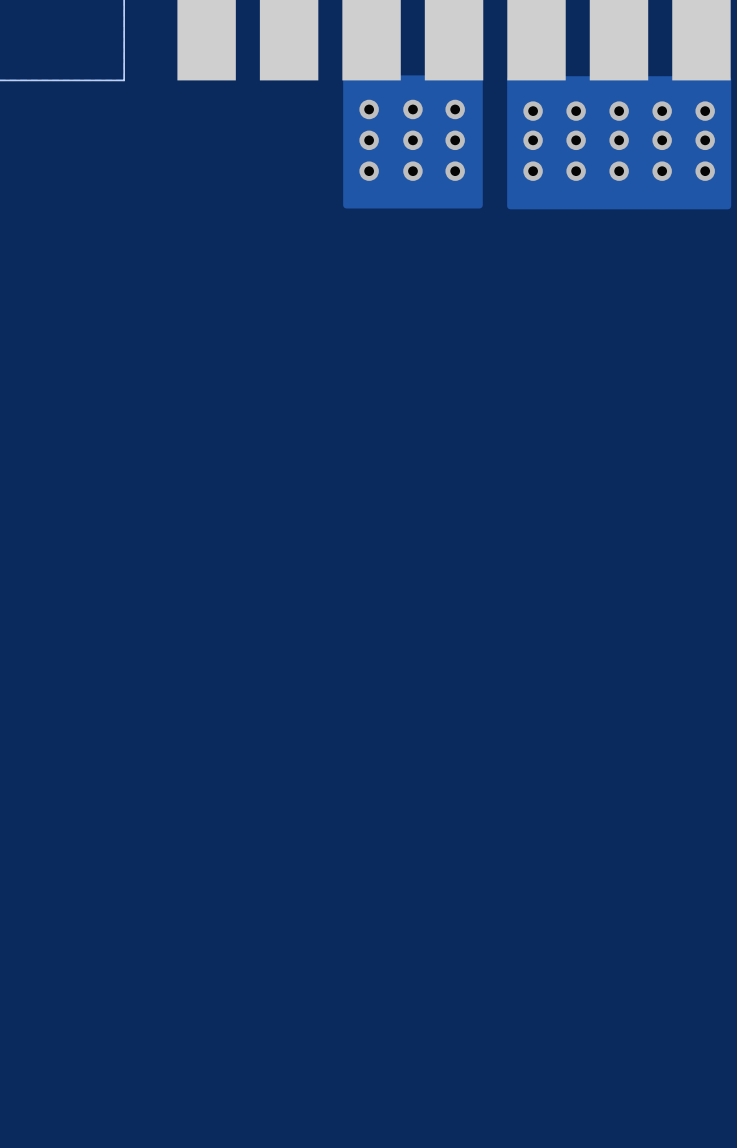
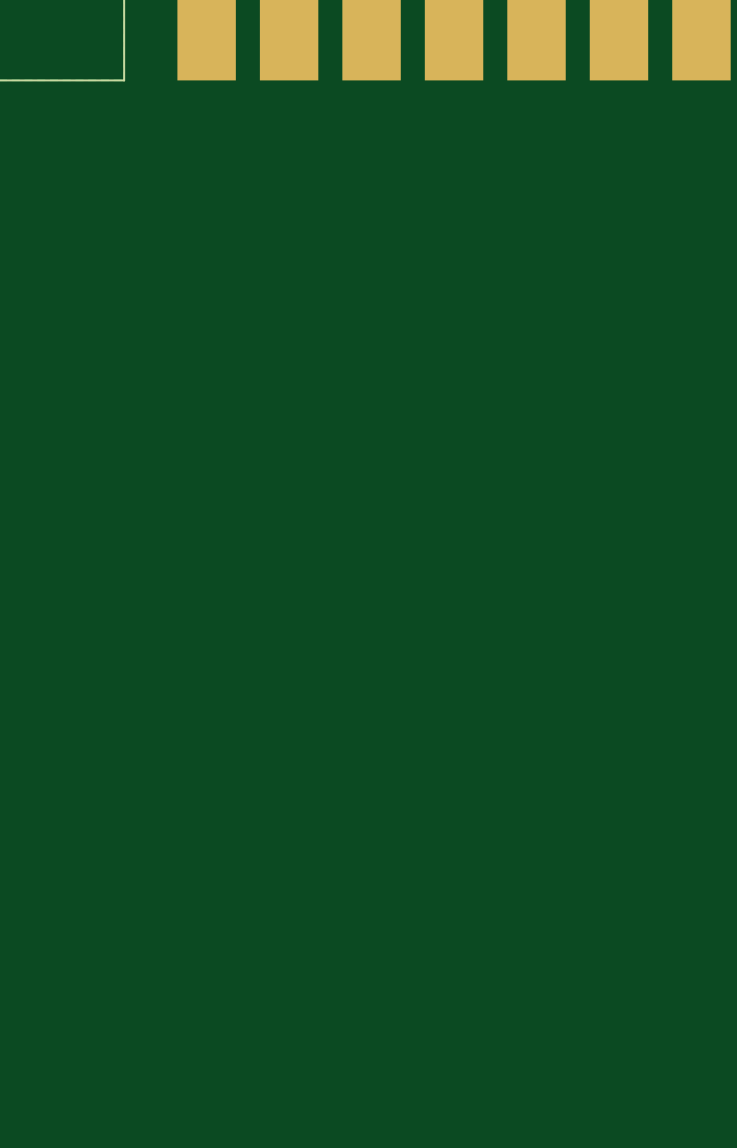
drawing: [343, 75, 732, 210] -> none
via: (369, 109) -> none
via: (412, 109) -> none
via: (455, 109) -> none
via: (533, 111) -> none
via: (576, 111) -> none
via: (619, 111) -> none
via: (662, 111) -> none
via: (705, 111) -> none
via: (369, 140) -> none
via: (412, 140) -> none
via: (455, 140) -> none
via: (533, 140) -> none
via: (576, 140) -> none
via: (619, 140) -> none
via: (662, 140) -> none
via: (705, 140) -> none
via: (369, 171) -> none
via: (412, 171) -> none
via: (455, 171) -> none
via: (533, 171) -> none
via: (576, 171) -> none
via: (619, 171) -> none
via: (662, 171) -> none
via: (705, 171) -> none

